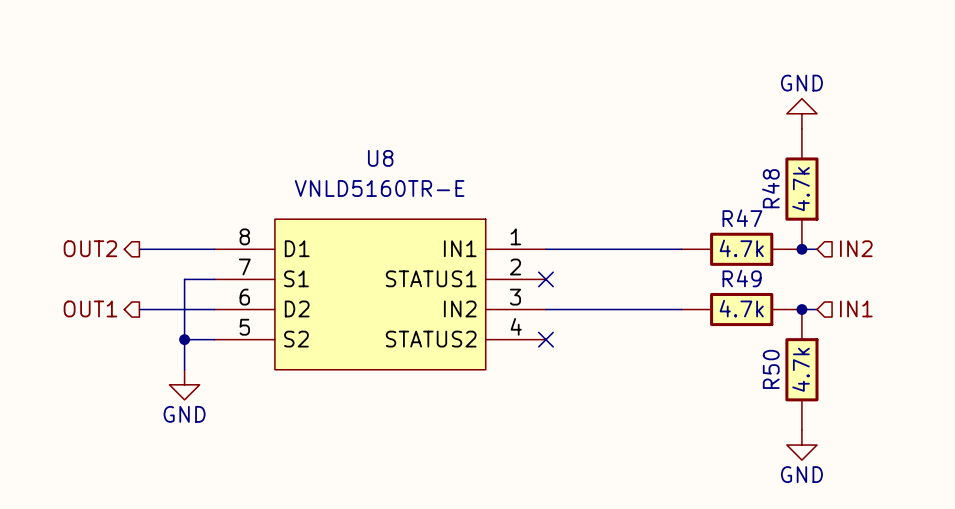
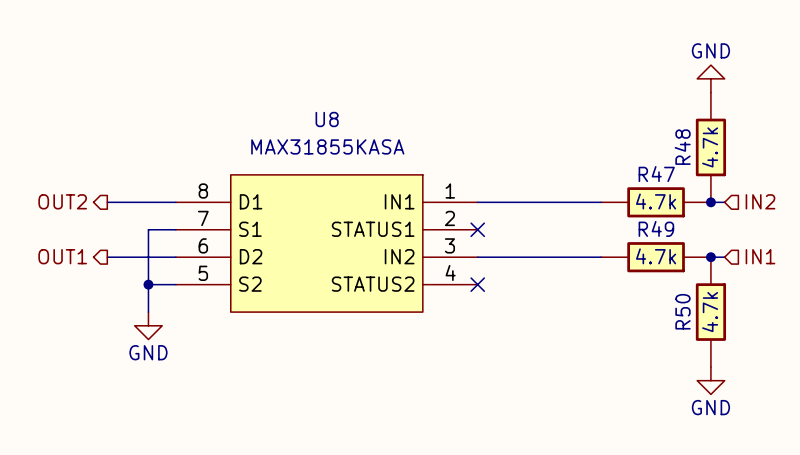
U8 value: VNLD5160TR-E (379, 188) -> MAX31855KASA (327, 146)

